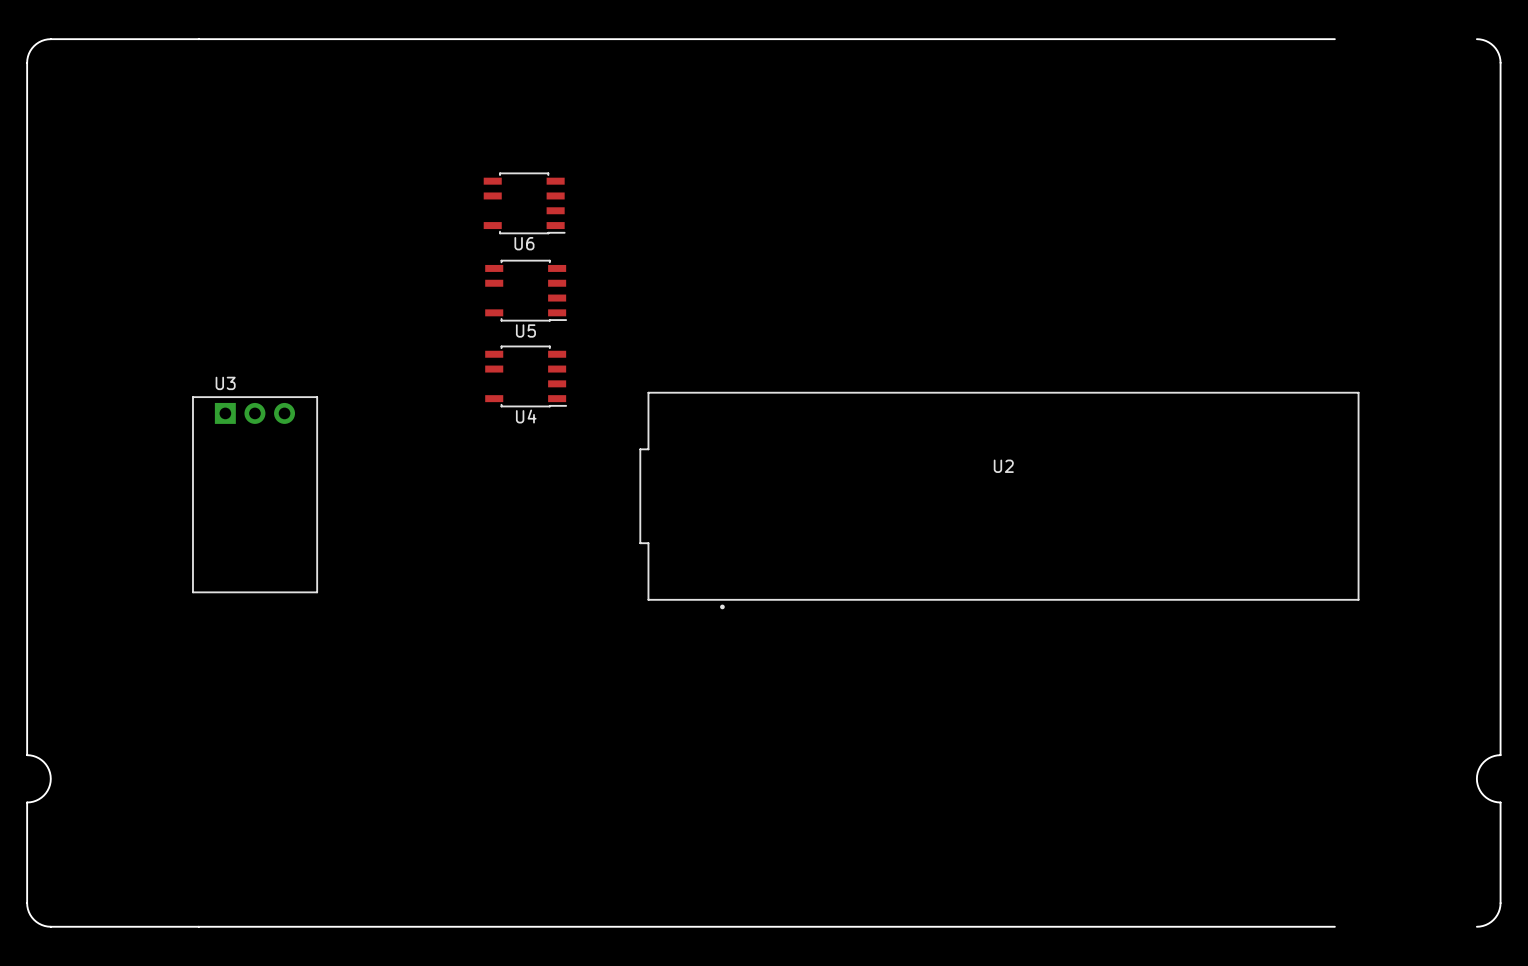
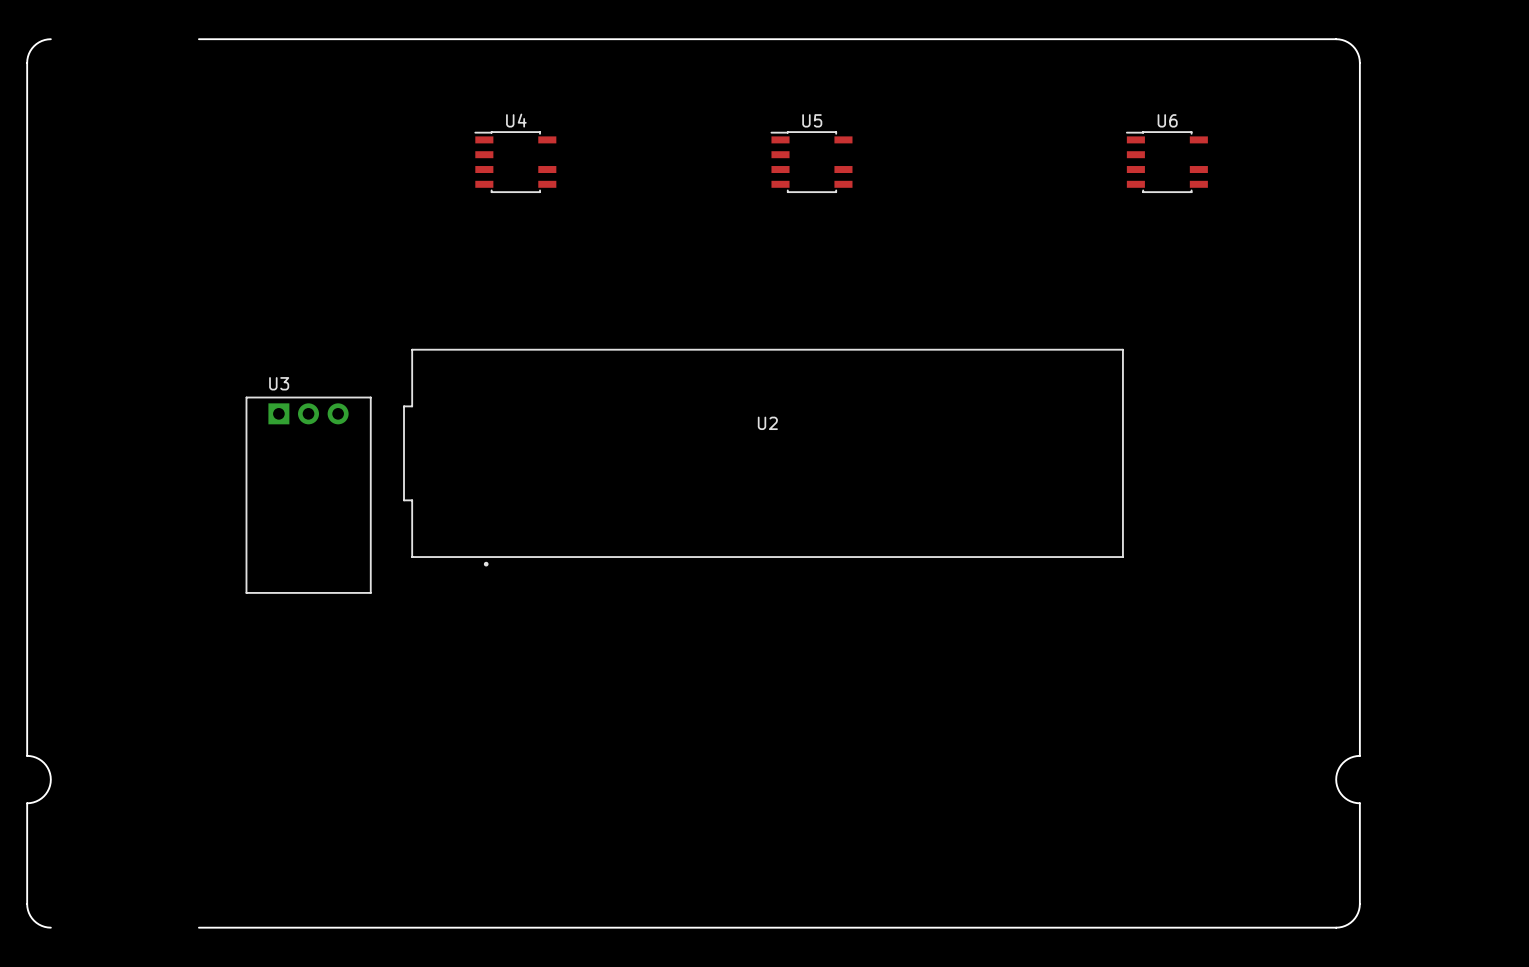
board edge: (50, 39) (198, 39) -> none
board edge: (1476, 39) (1485, 40) (1493, 46) (1498, 53) (1500, 62) (1500, 755) (1491, 756) (1483, 762) (1478, 769) (1476, 778) (1478, 787) (1483, 795) (1491, 800) (1500, 802) (1500, 903) (1498, 912) (1493, 919) (1485, 924) (1476, 926) -> (1336, 39) (1345, 41) (1352, 46) (1358, 53) (1359, 62) (1359, 755) (1350, 757) (1343, 762) (1337, 770) (1336, 779) (1337, 788) (1343, 796) (1350, 801) (1359, 803) (1359, 903) (1358, 913) (1352, 920) (1345, 925) (1336, 927)
U6 rotation: 0° (524, 203) -> 180° (1166, 162)
U6 position: (524, 203) -> (1166, 162)
U5 rotation: 0° (526, 290) -> 180° (811, 162)
U5 position: (526, 290) -> (811, 162)
U4 rotation: 0° (526, 376) -> 180° (515, 162)
U4 position: (526, 376) -> (515, 162)
U3 position: (255, 494) -> (308, 495)
U2 position: (999, 500) -> (763, 457)
board edge: (50, 926) (198, 926) -> none

